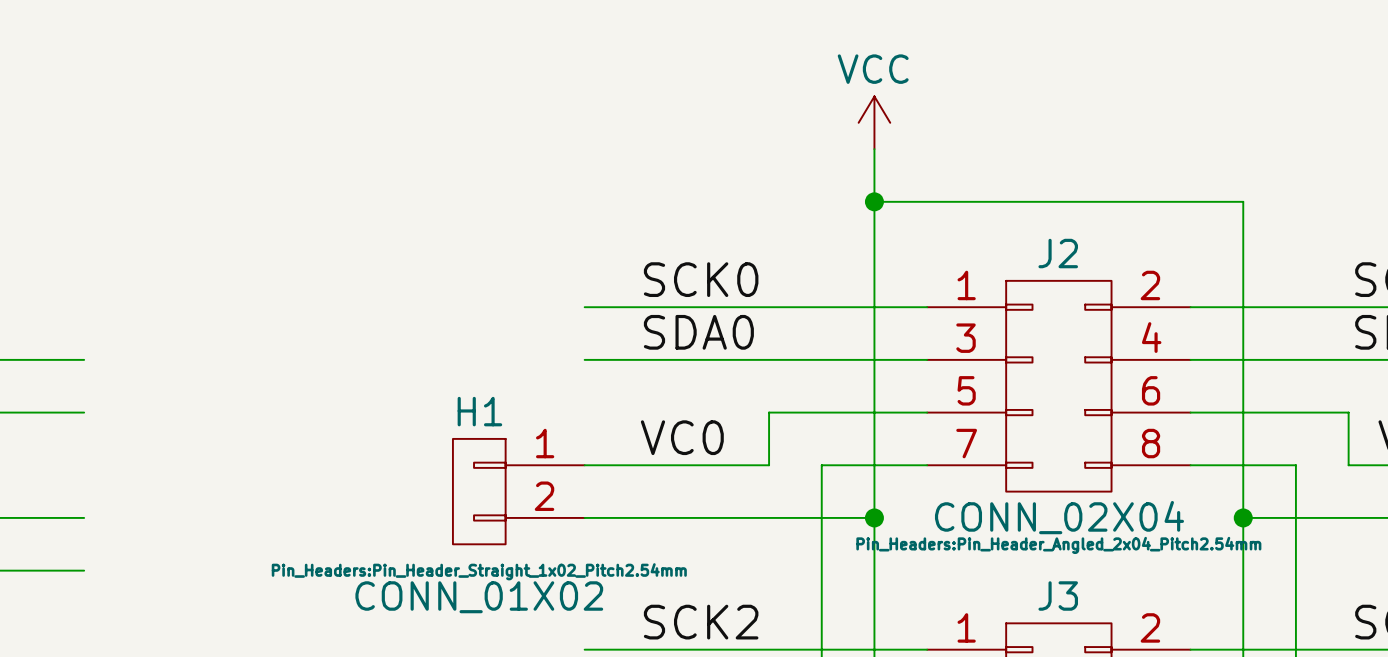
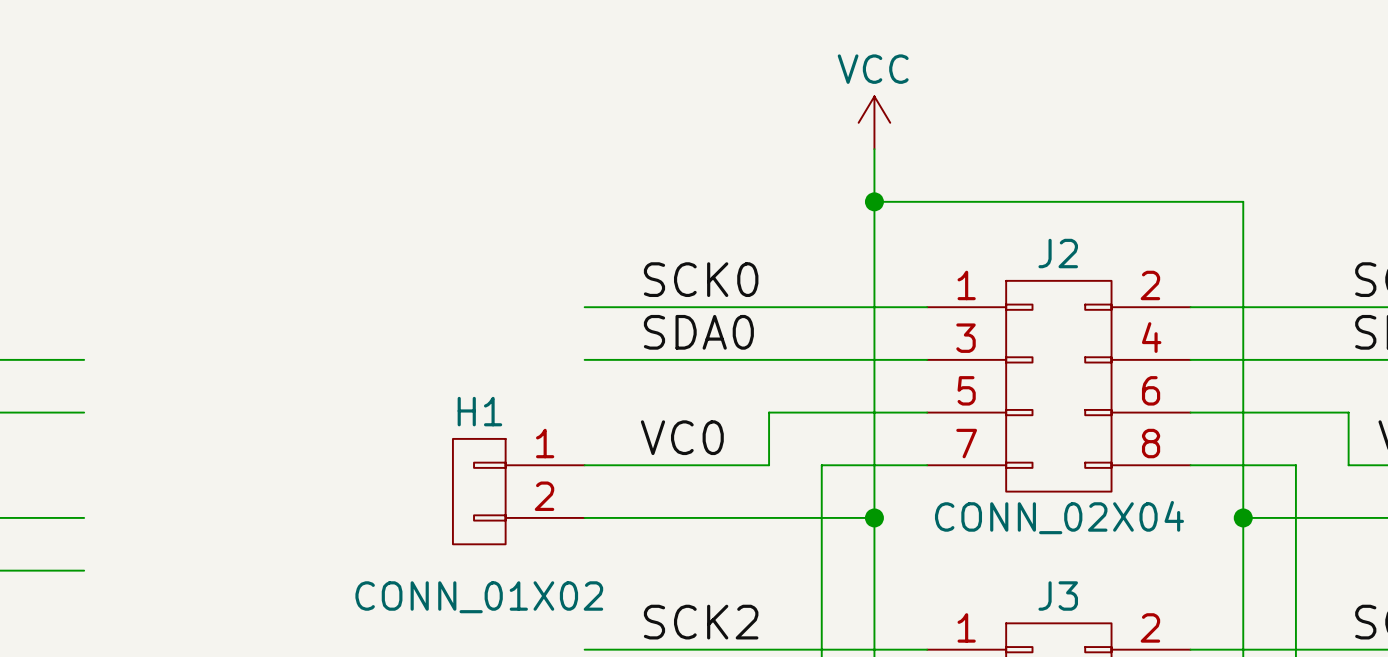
J2 text: Pin_Headers:Pin_Header_Angled_2x04_Pitch2.54mm (1058, 545) -> none
H1 text: Pin_Headers:Pin_Header_Straight_1x02_Pitch2.54mm (479, 571) -> none

